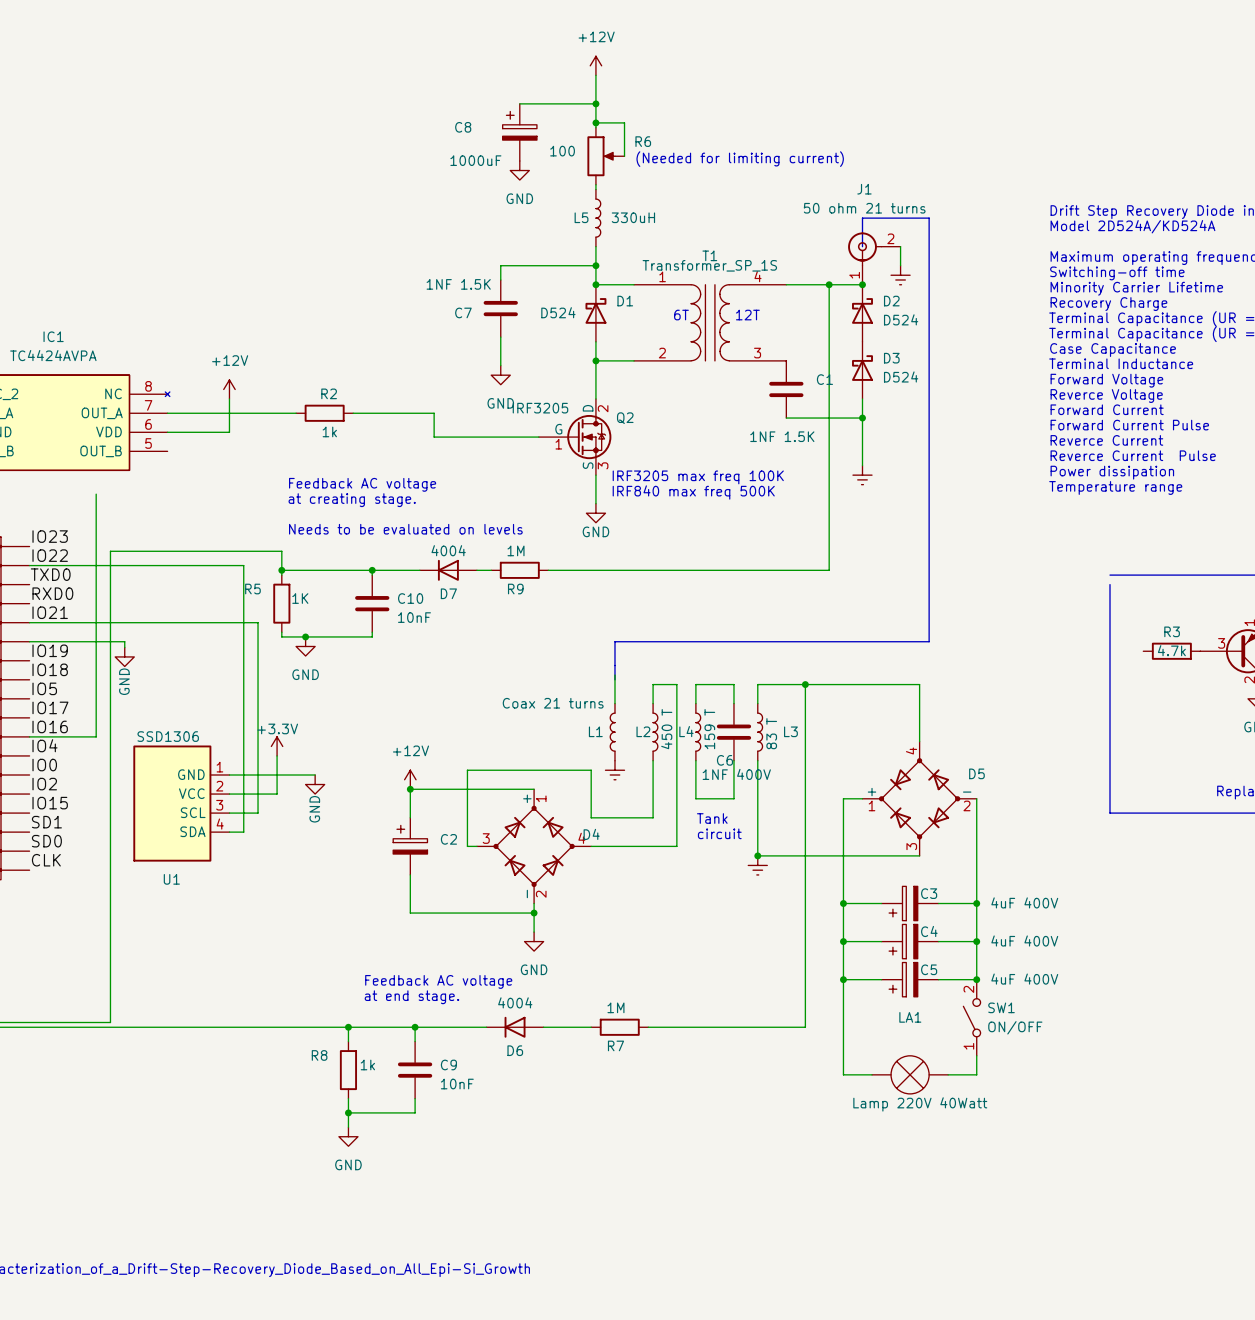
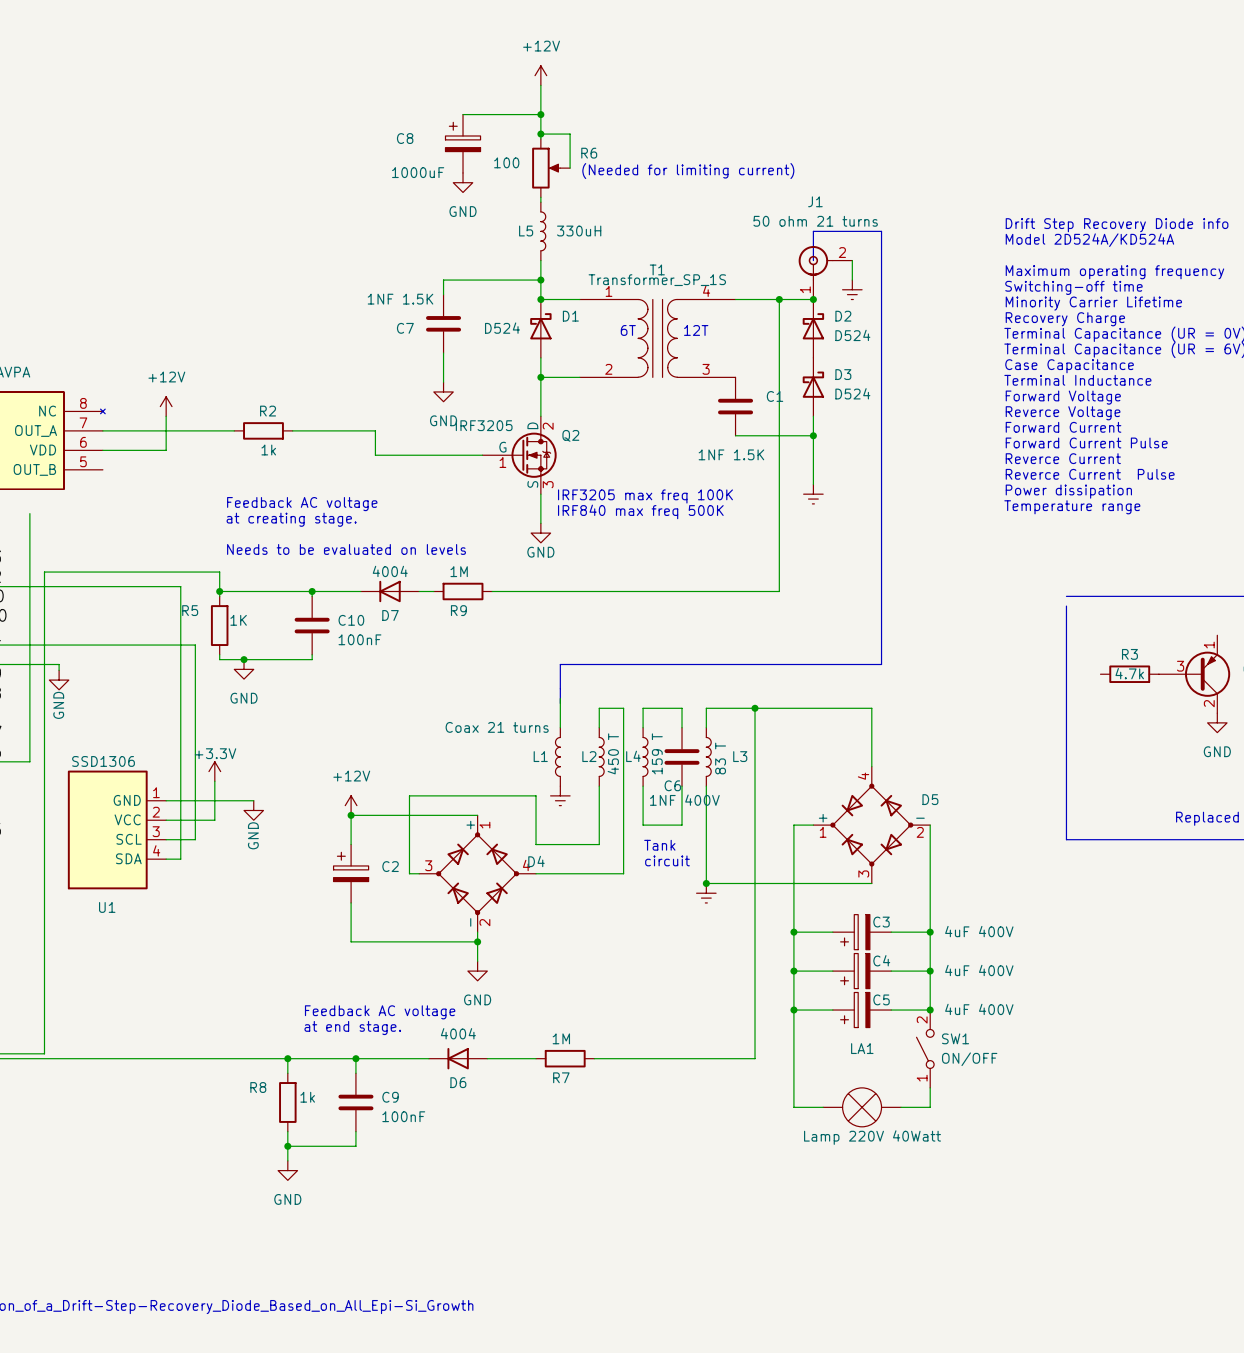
C10 value: 10nF (414, 617) -> 100nF (359, 639)
C9 value: 10nF (457, 1084) -> 100nF (403, 1116)

